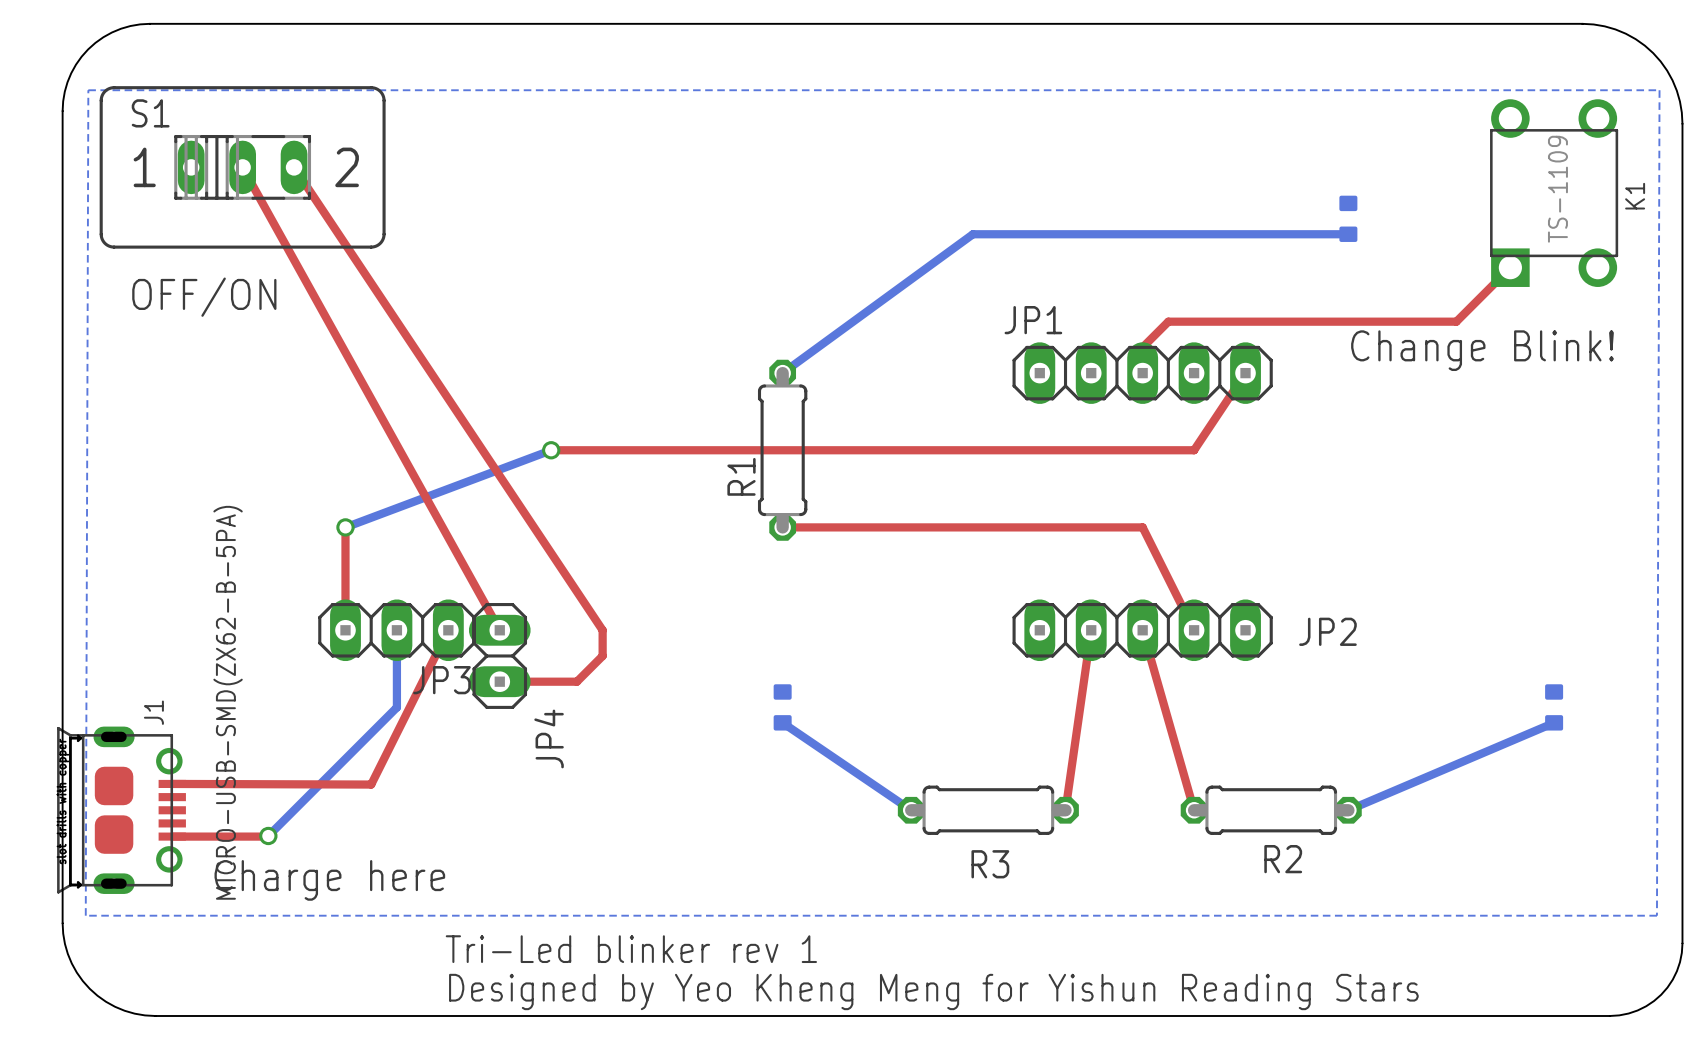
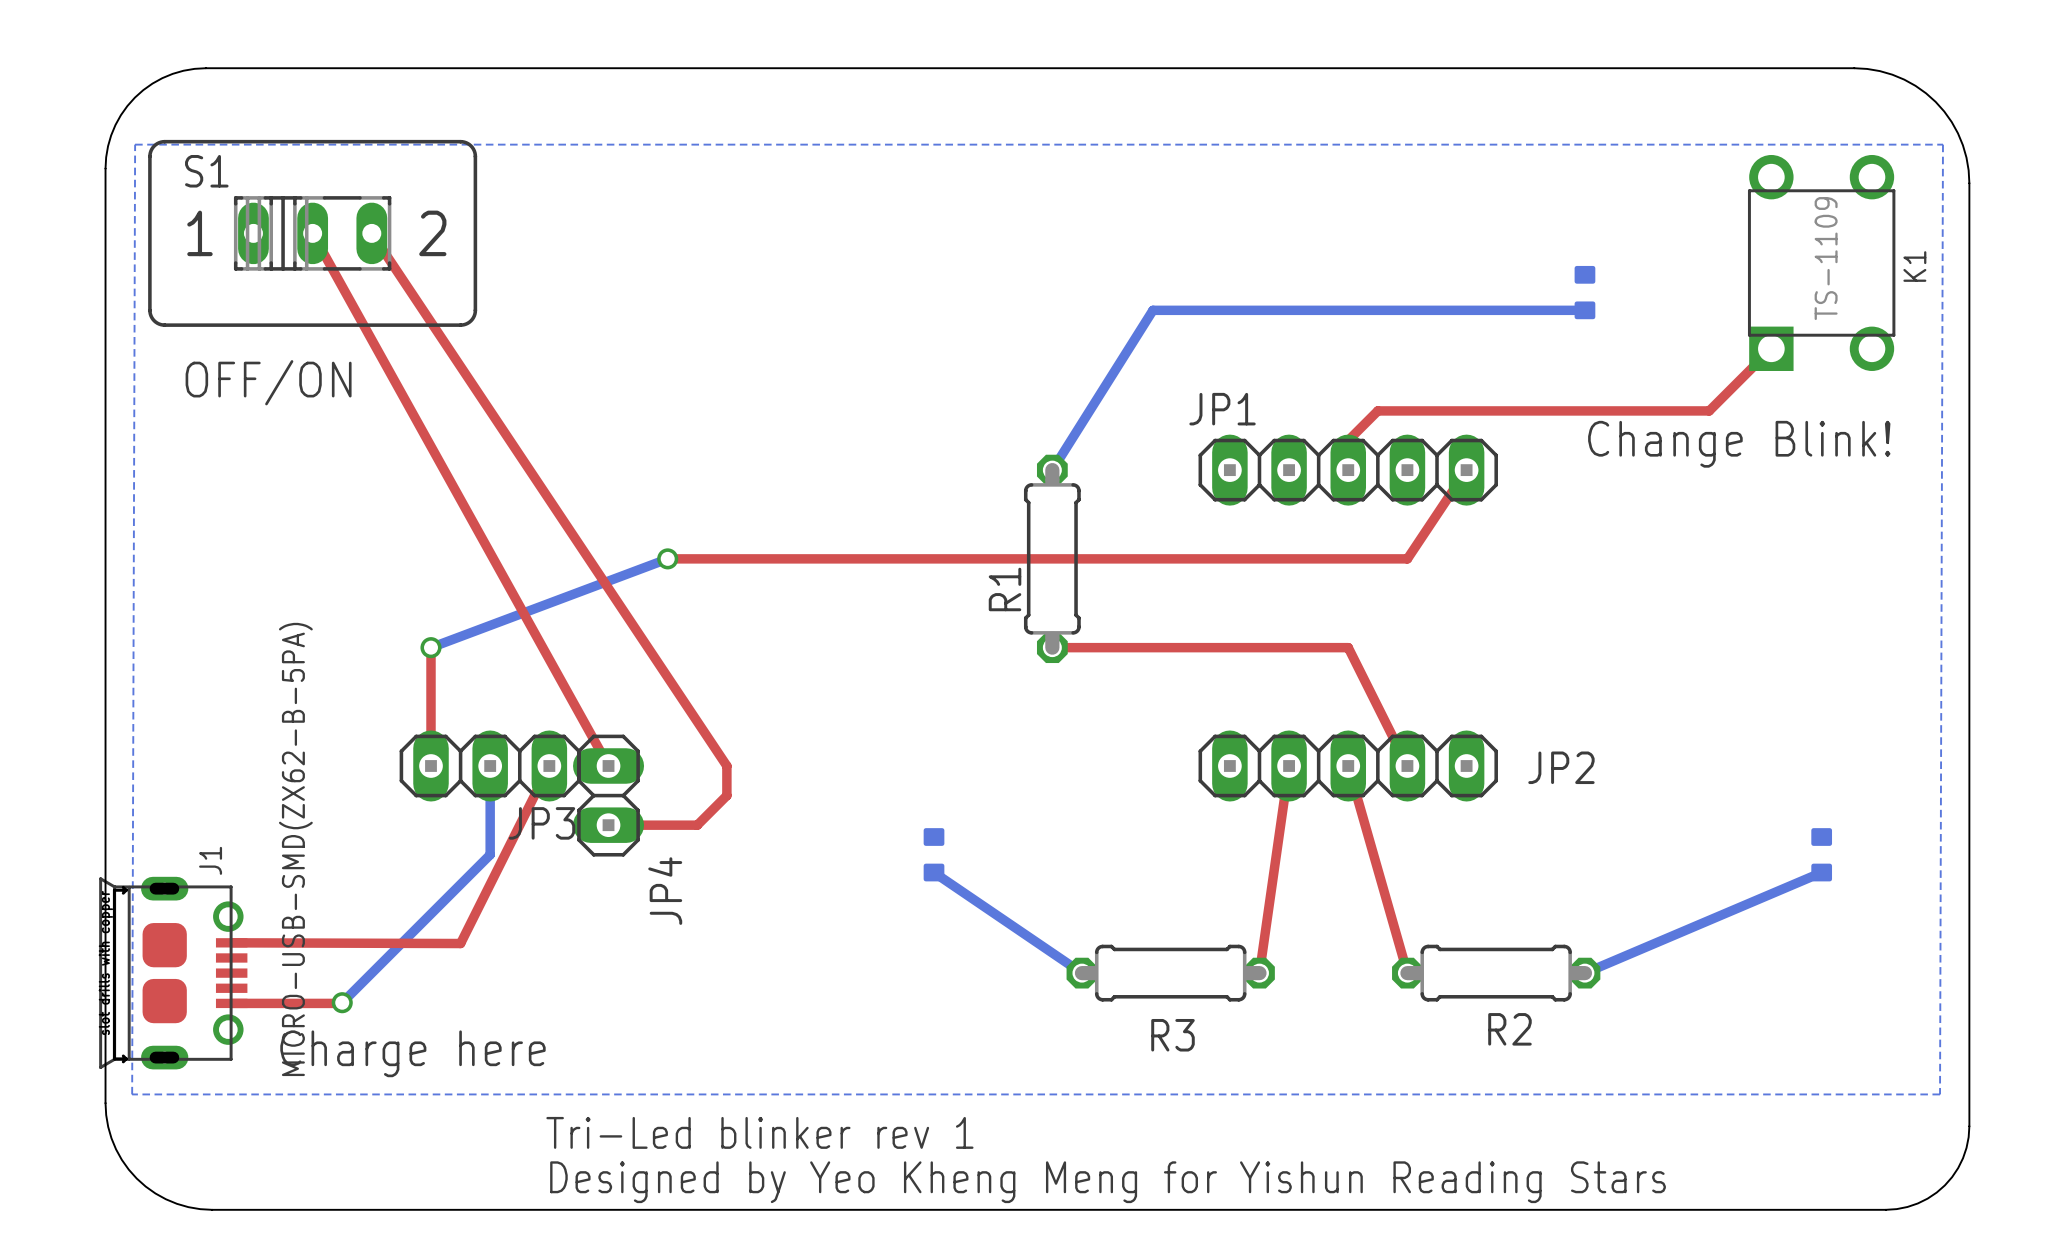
bottom track: (972, 234) (782, 373) -> (1152, 310) (1052, 470)
R1 position: (782, 450) -> (1052, 558)
top track: (782, 527) (885, 527) -> none

